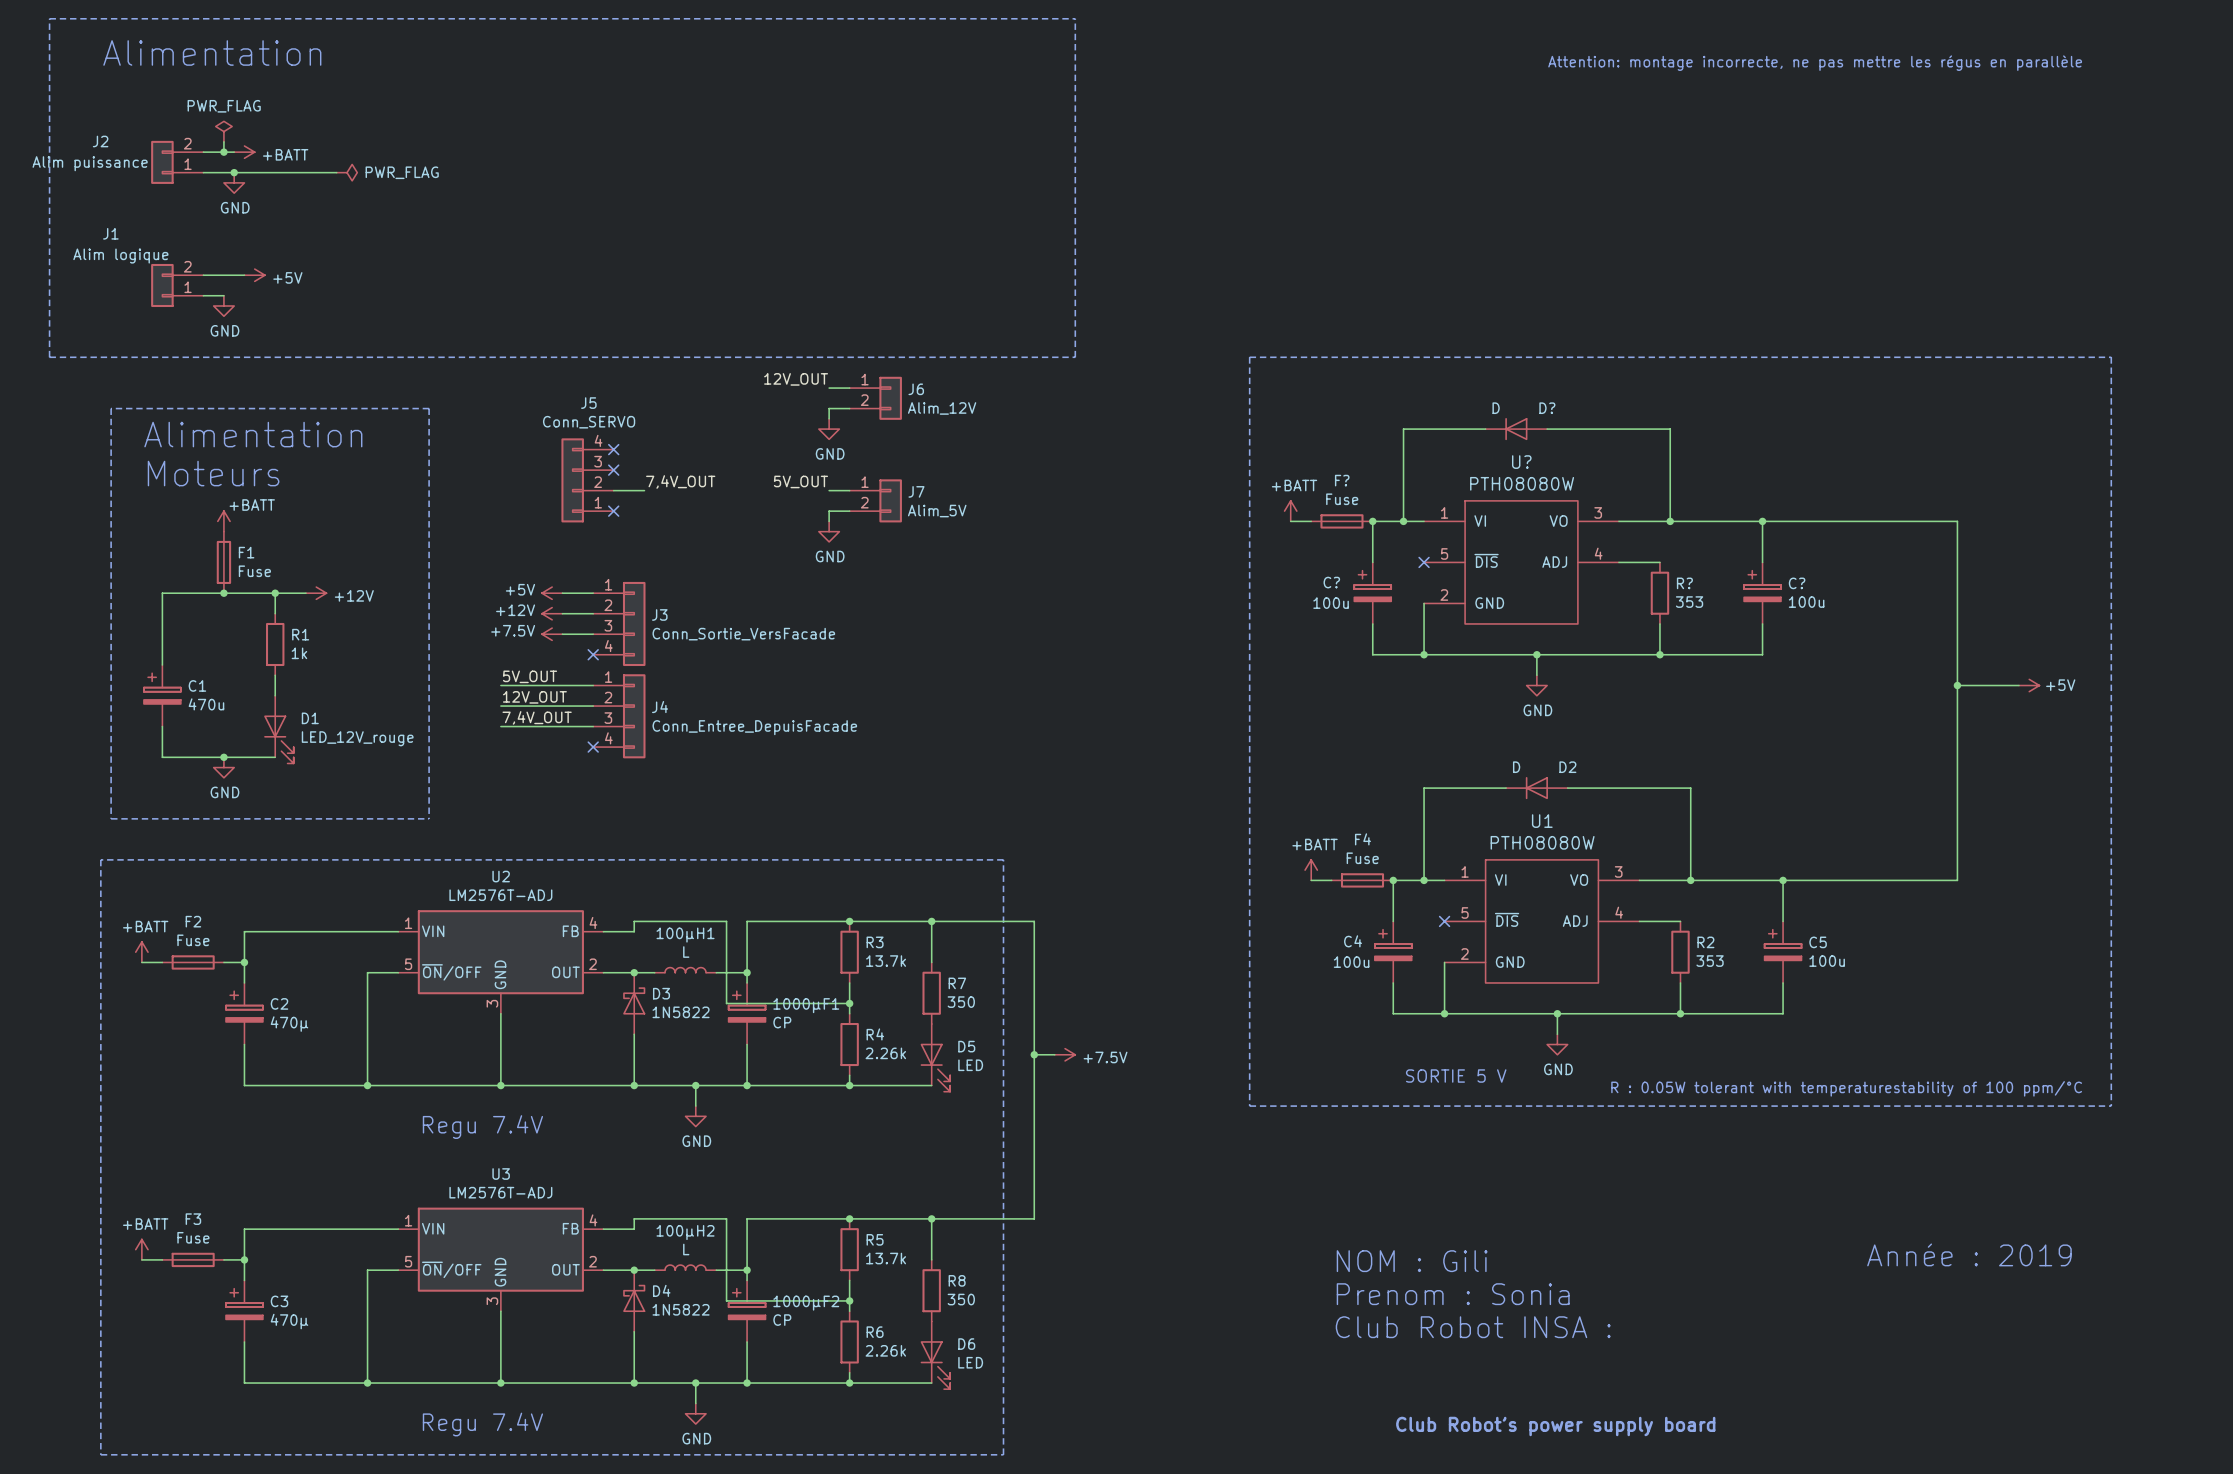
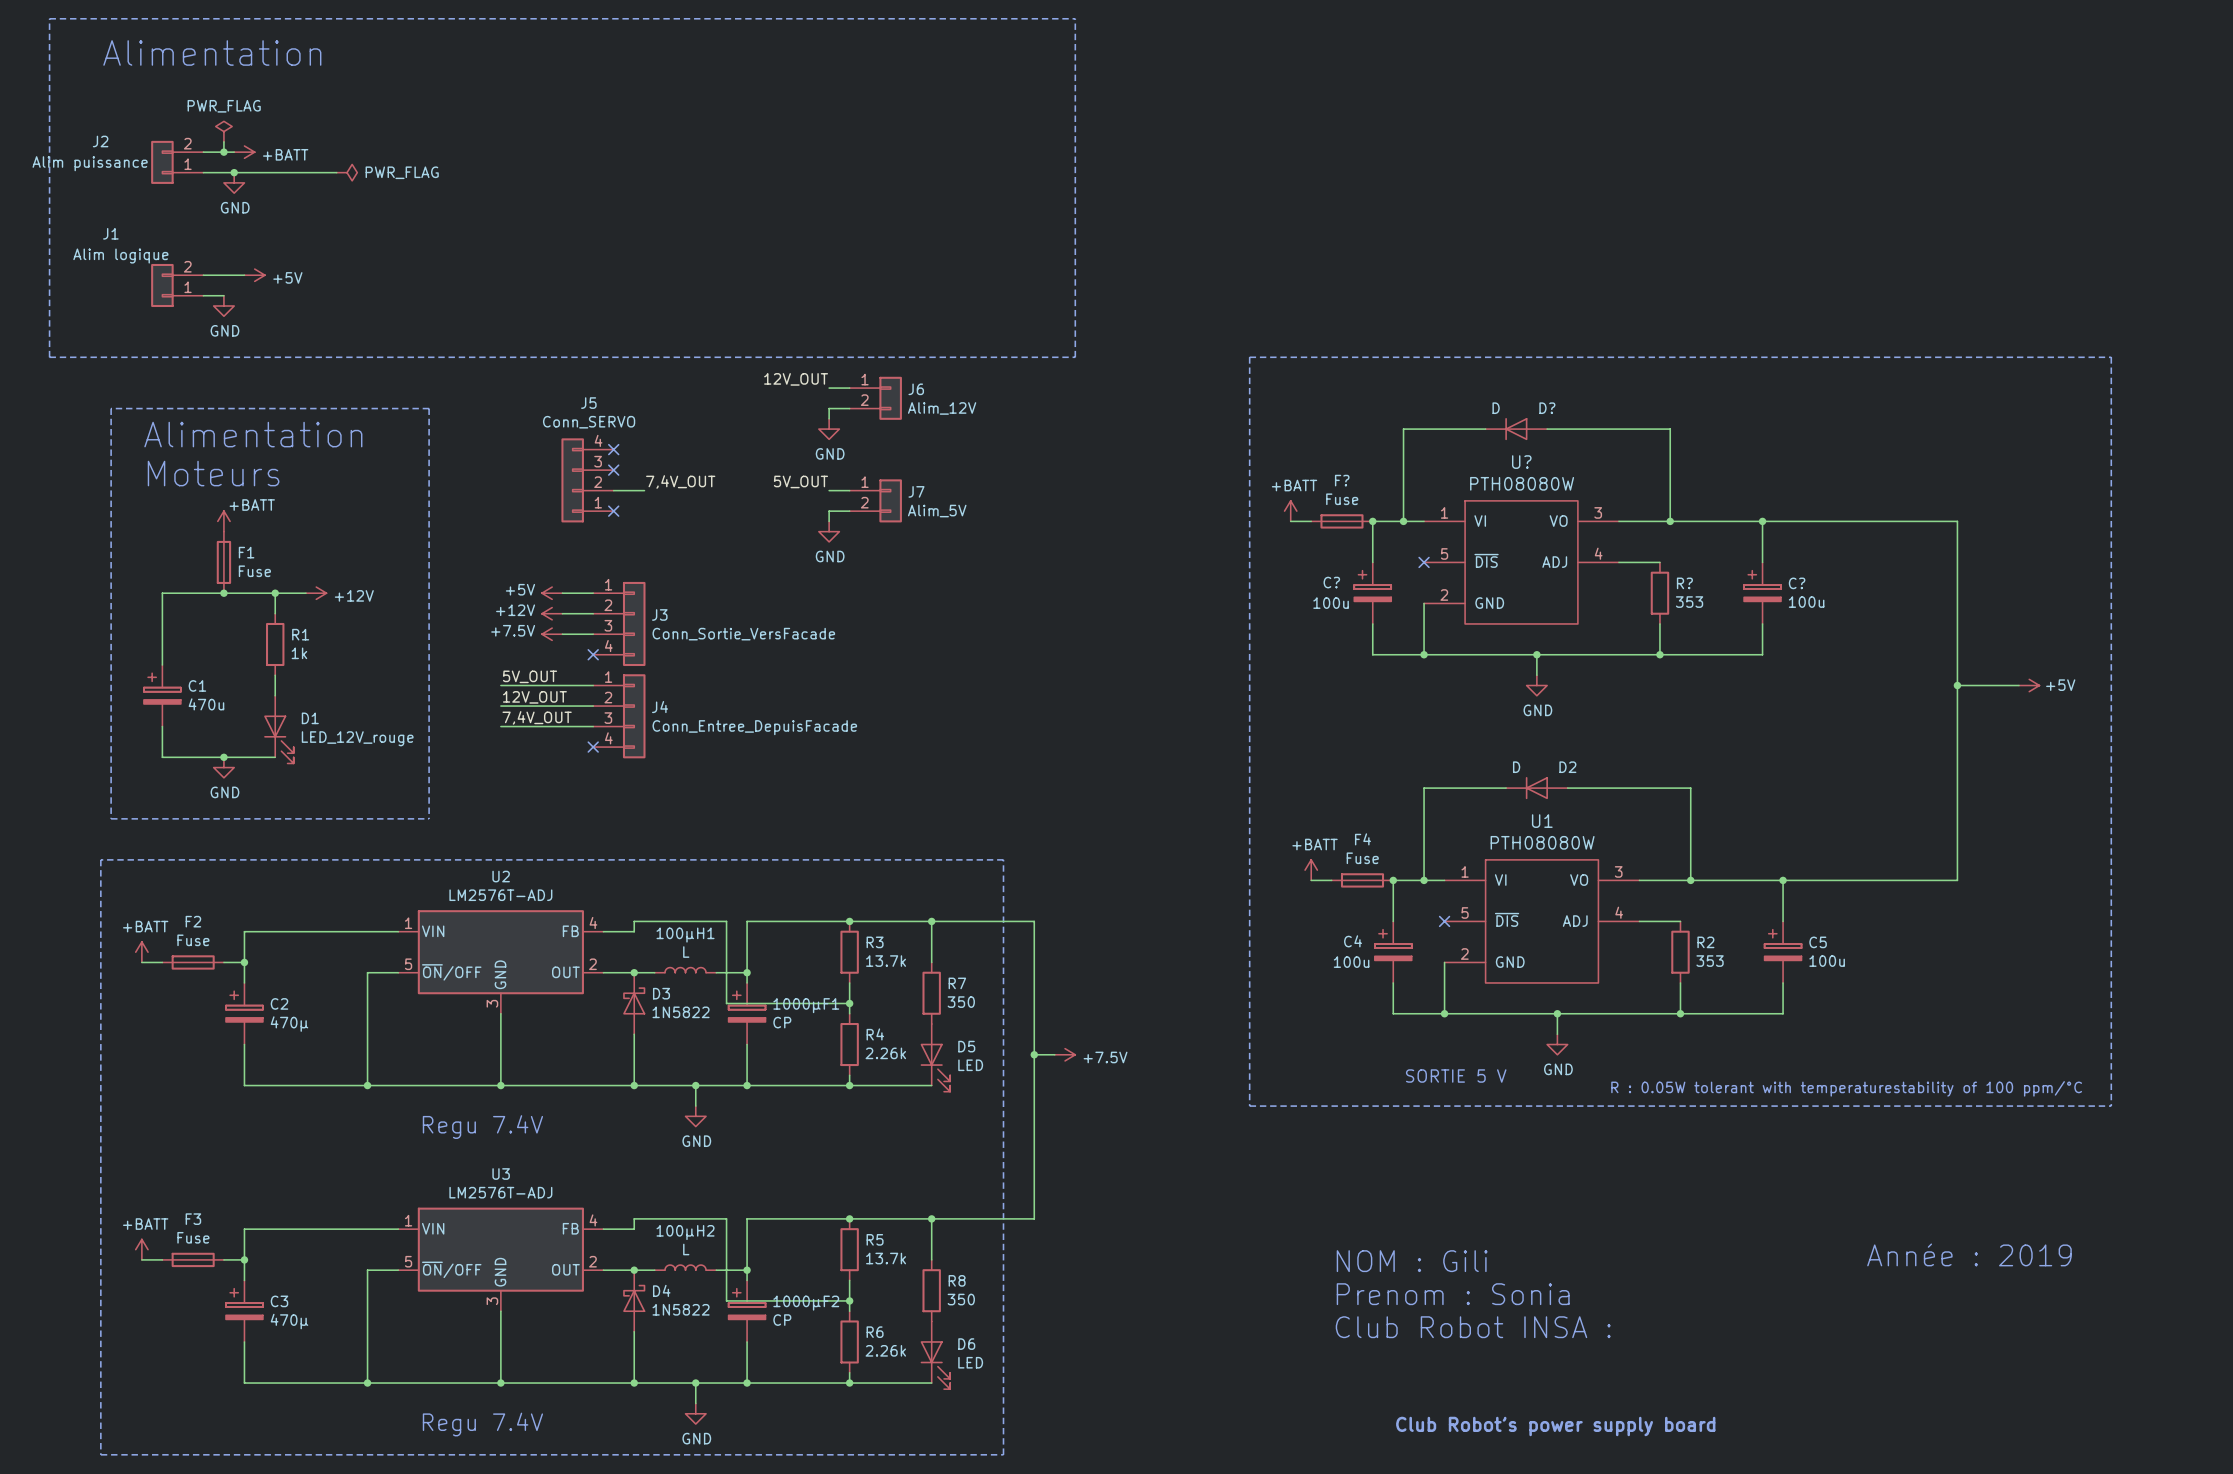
text: Attention: montage incorrecte, ne pas mettre les régus en parallèle (1815, 63) -> none

